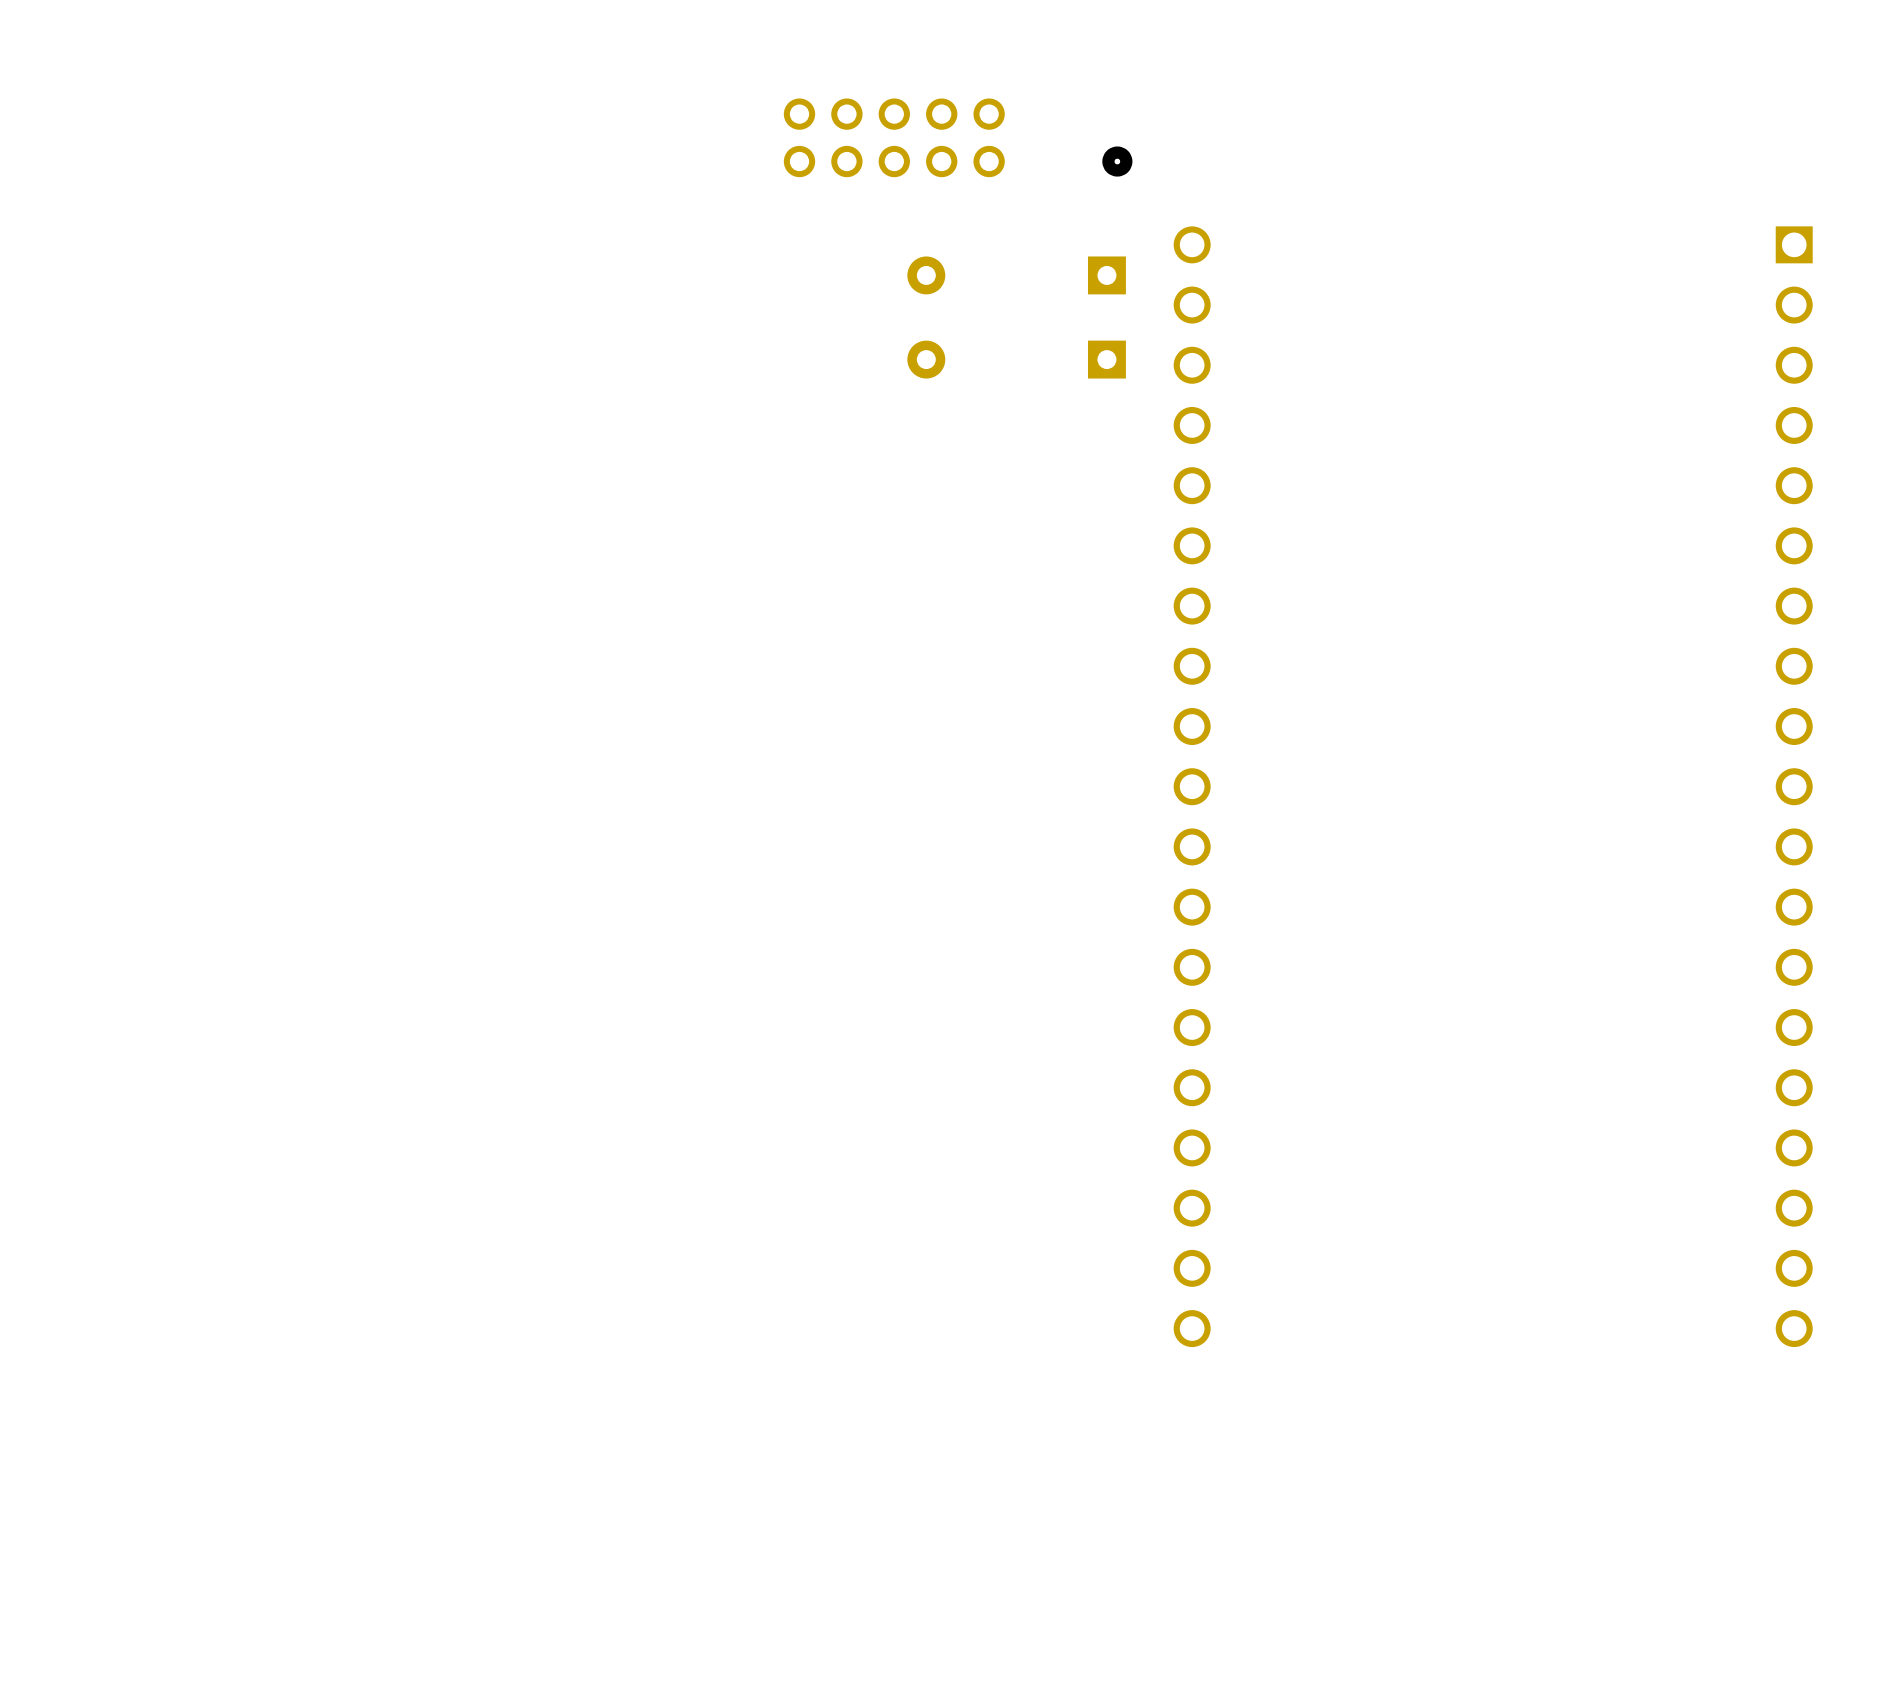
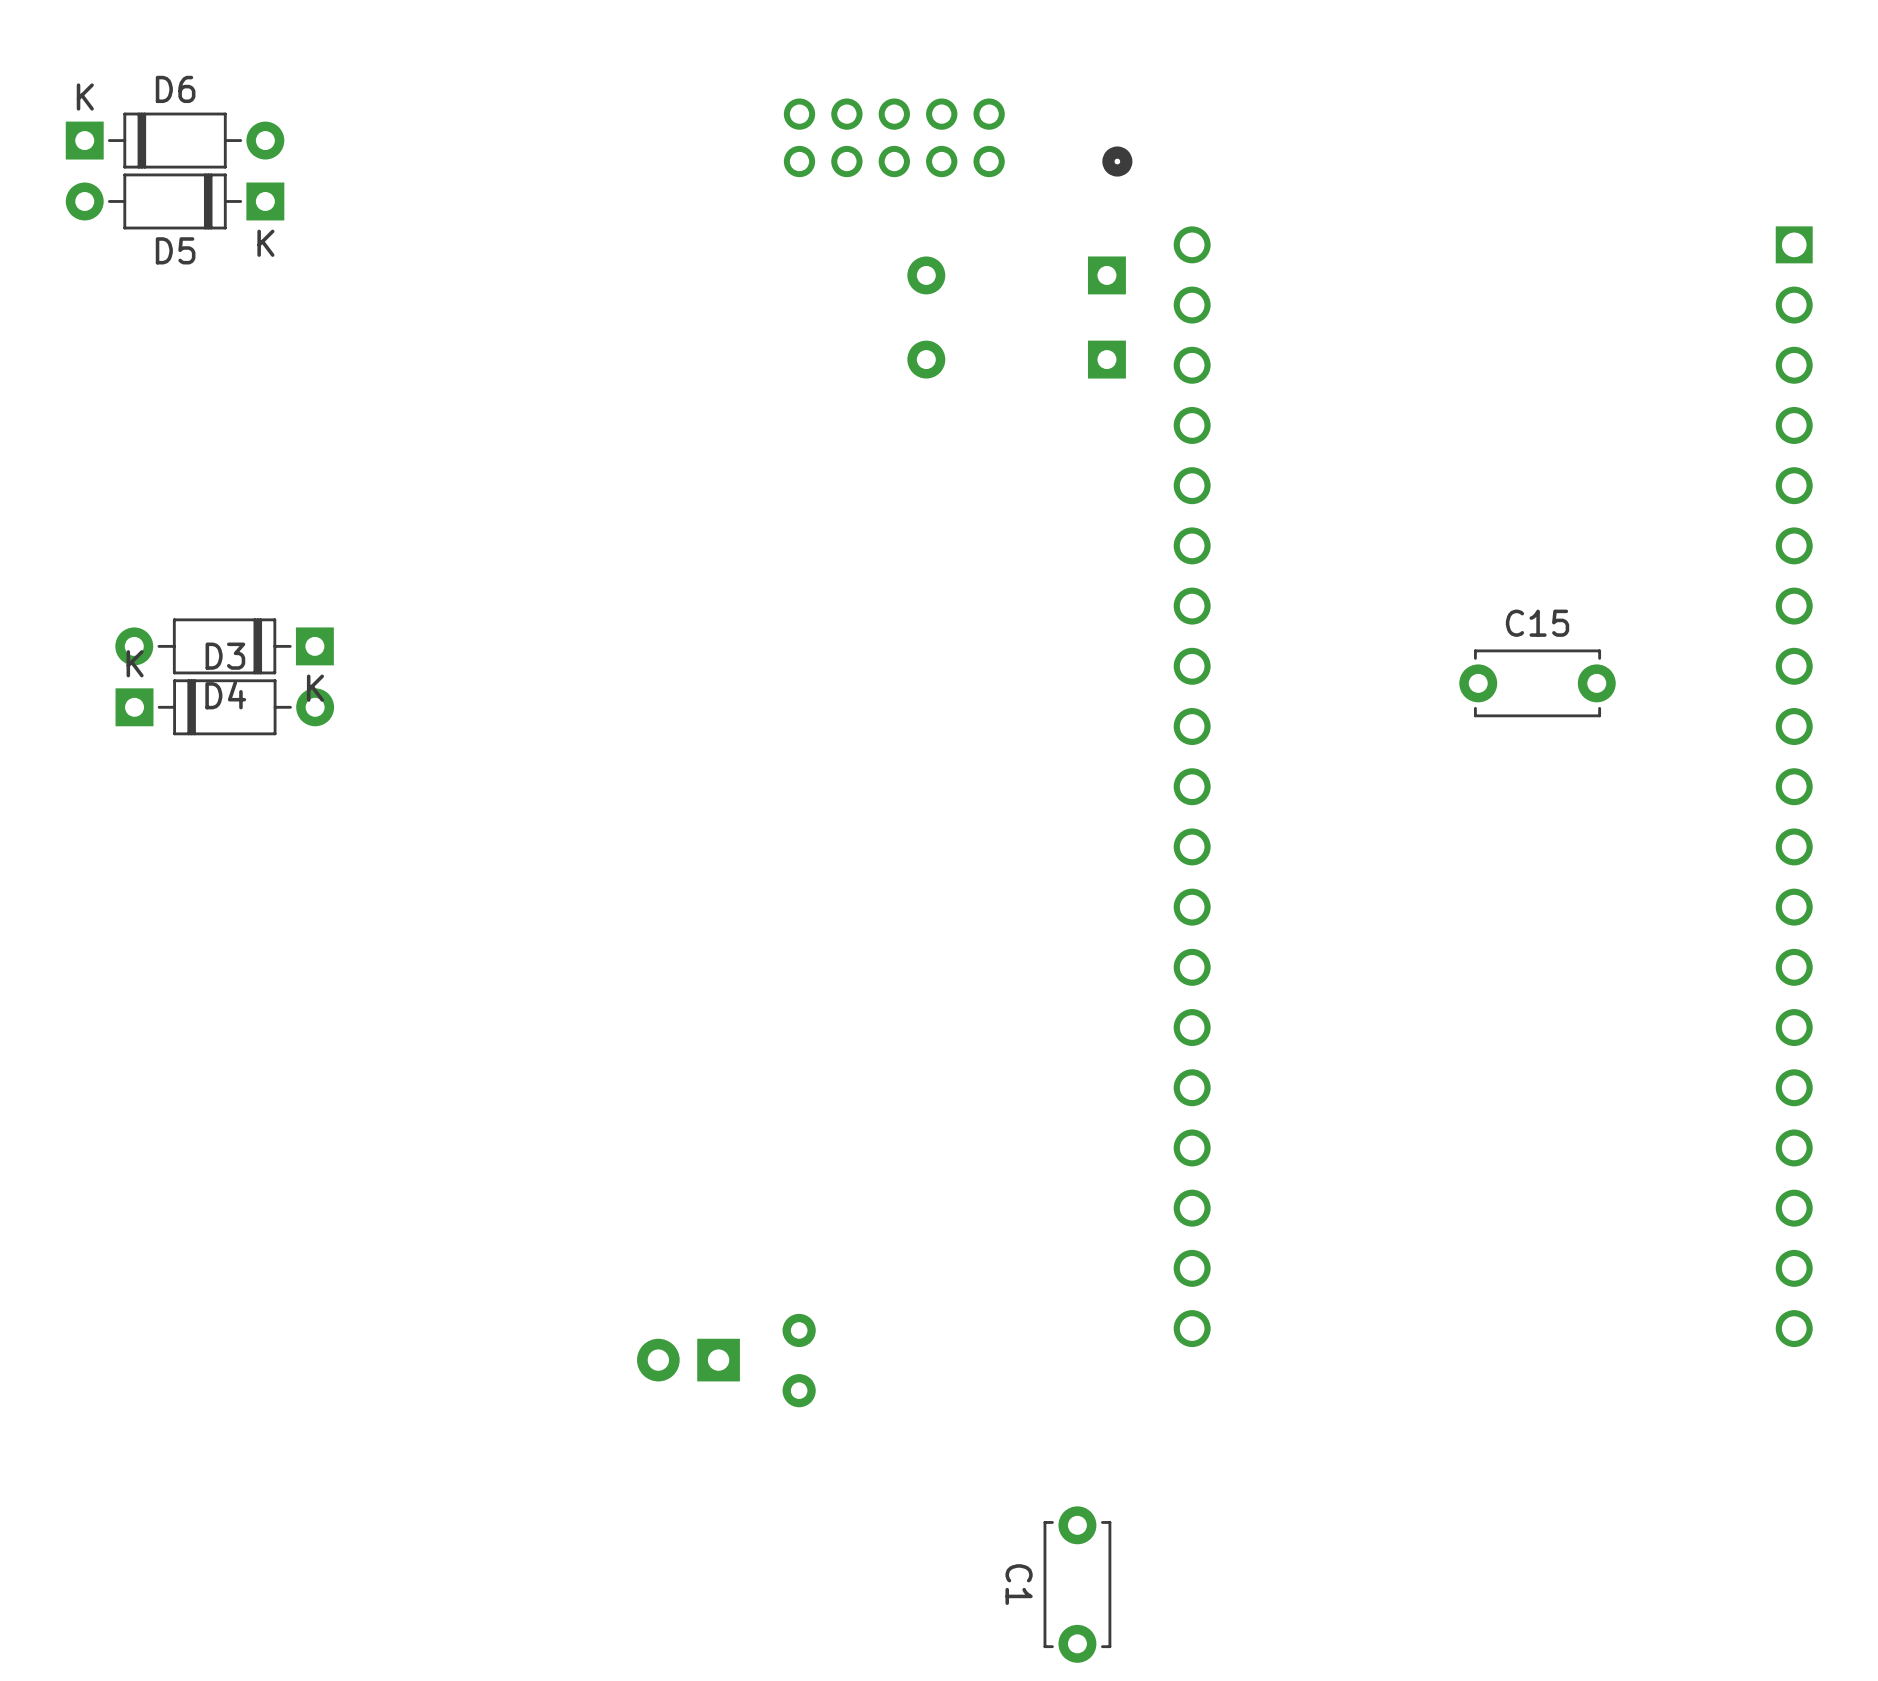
D6: none -> (175, 140)
D5: none -> (175, 201)
D4: none -> (224, 646)
C15: none -> (1537, 683)
D3: none -> (224, 707)
part: none -> (688, 1360)
part: none -> (799, 1360)
C1: none -> (1077, 1584)

